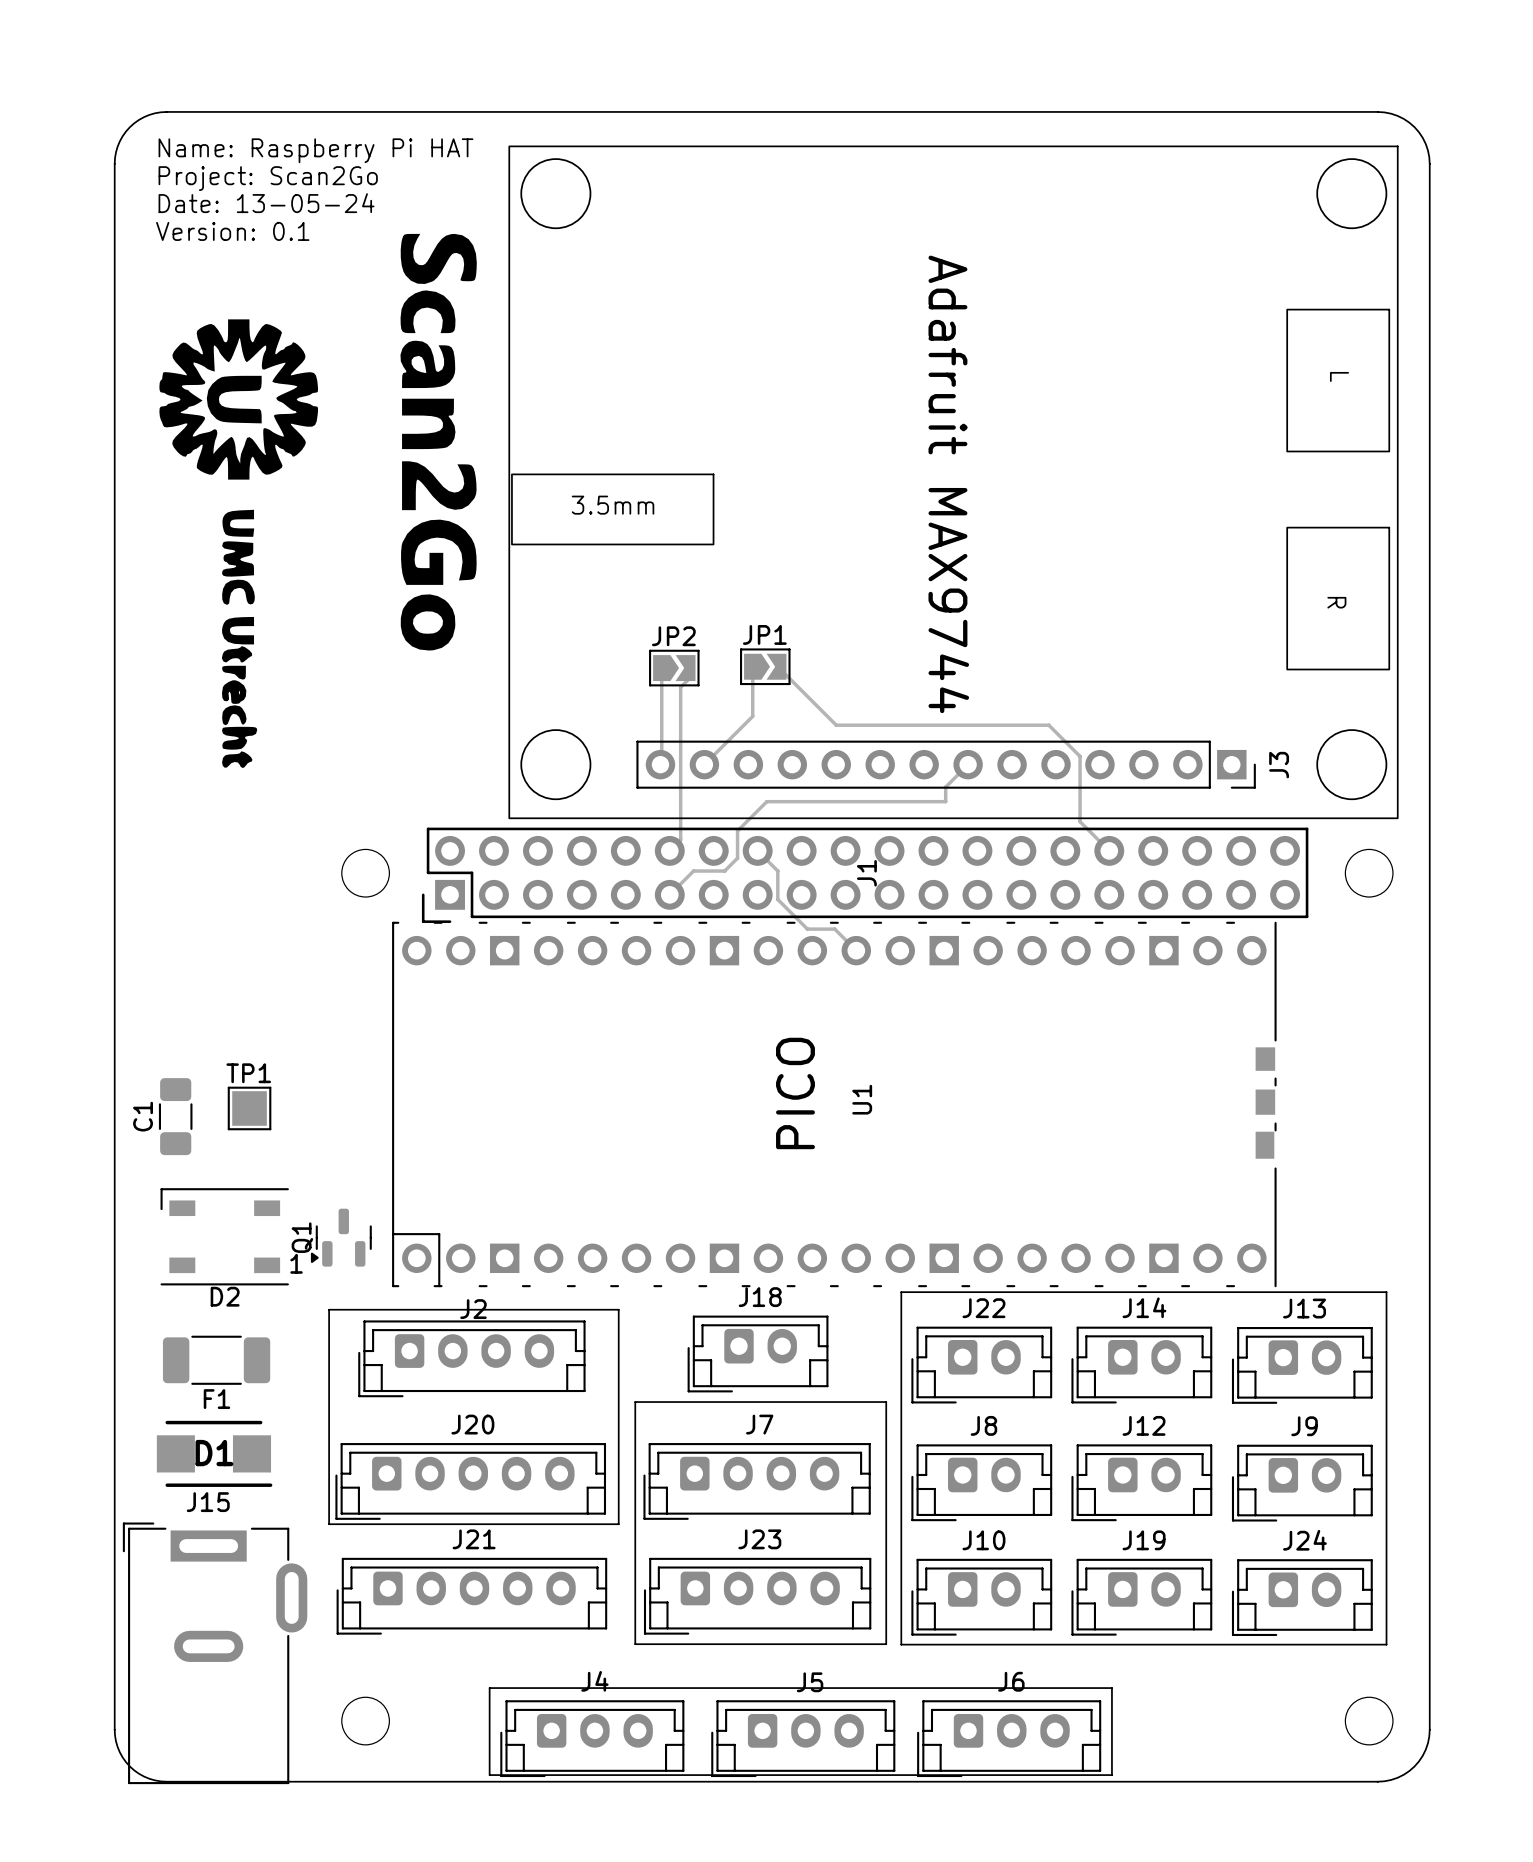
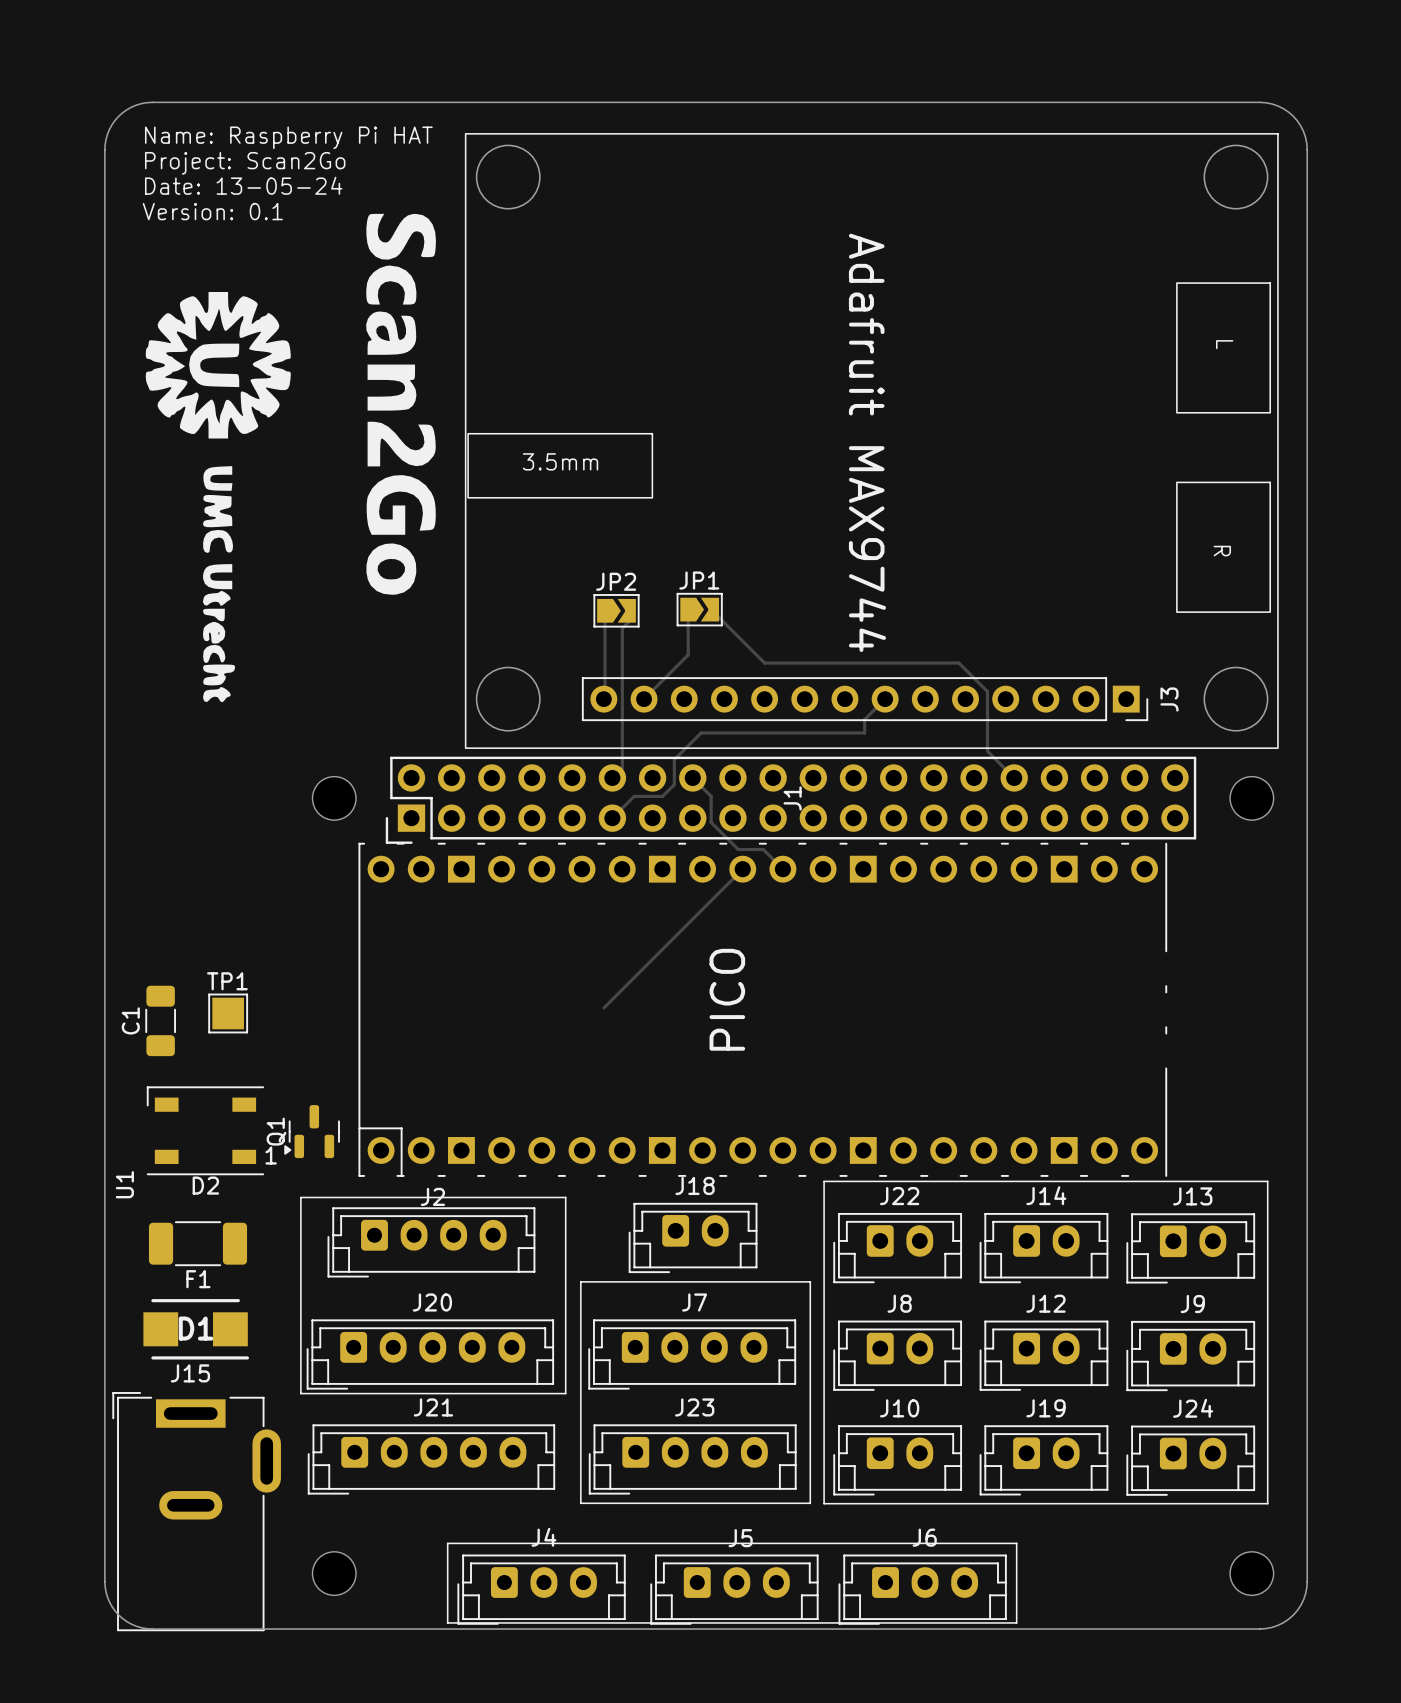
U1 footprint: [392, 921, 1277, 1288] -> [358, 842, 1168, 1177]
track: none -> (742, 869) (604, 1007)
U1 name position: U1 (862, 1099) -> U1 (124, 1184)

